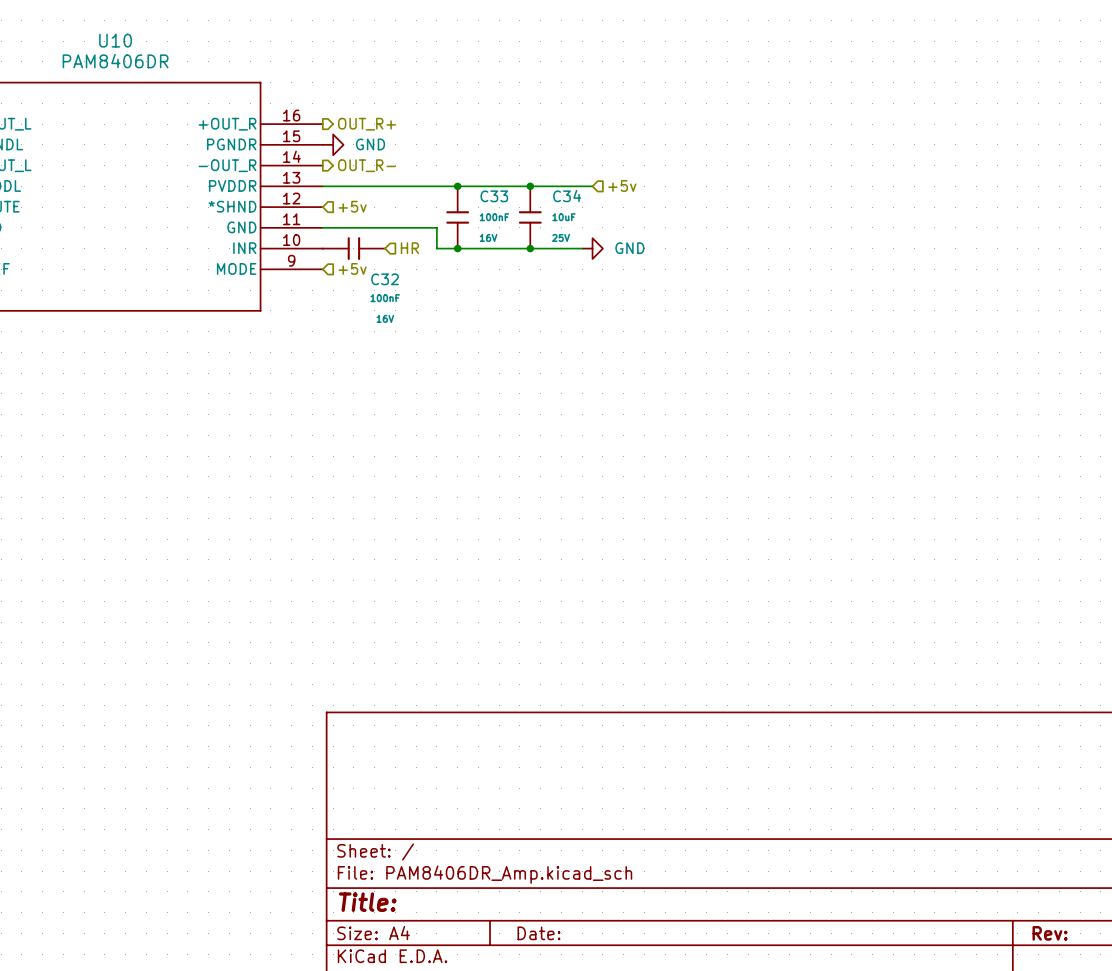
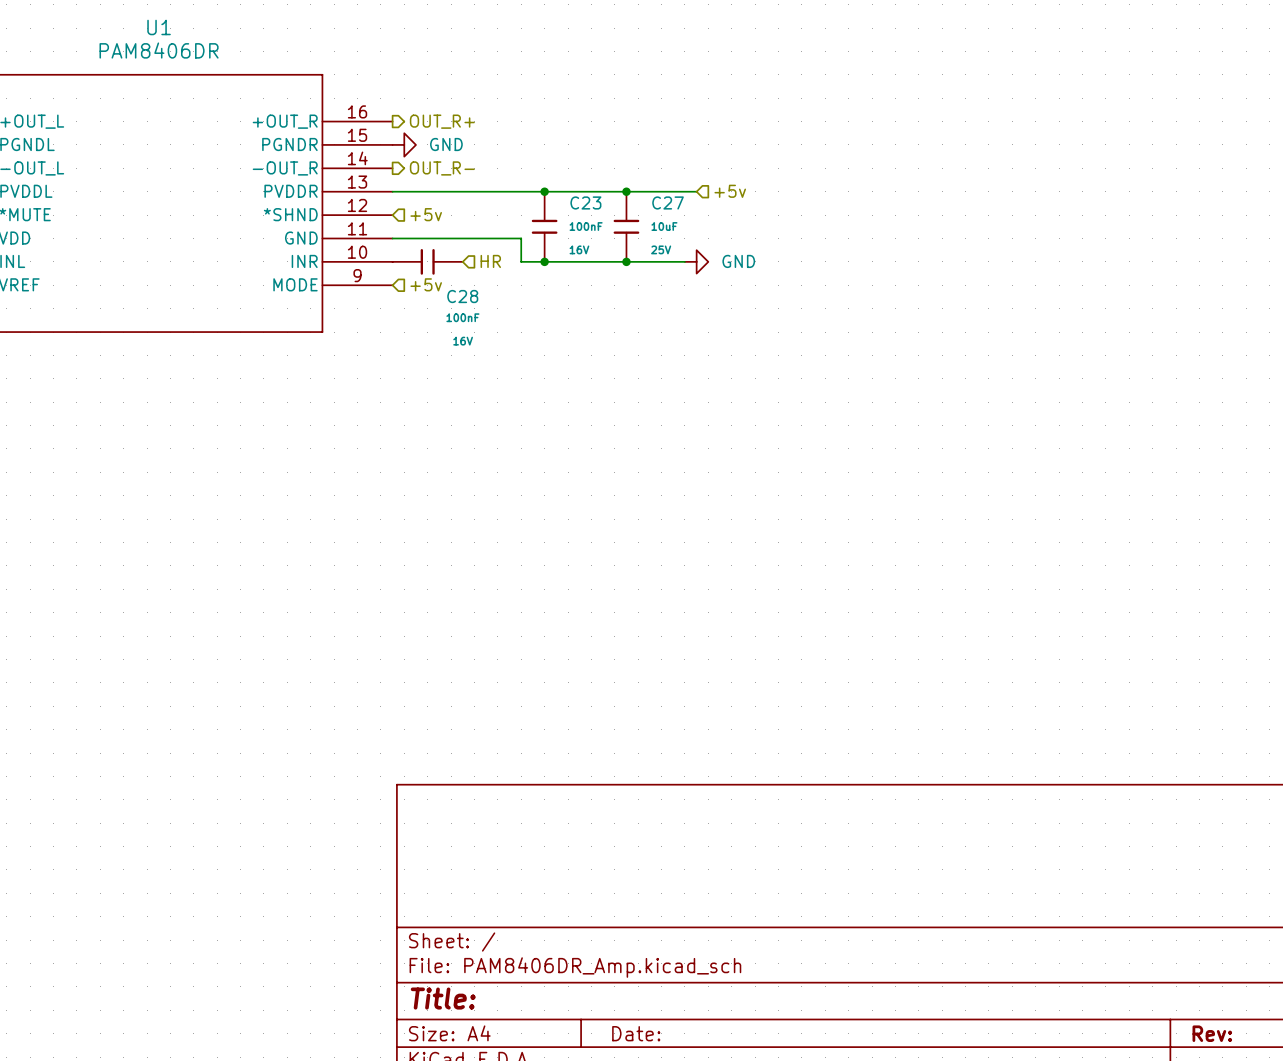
U10 name: U10 (115, 40) -> U1 (159, 27)
C33 name: C33 (494, 196) -> C23 (585, 202)
C34 name: C34 (567, 196) -> C27 (668, 202)
C32 name: C32 (385, 279) -> C28 (462, 296)

